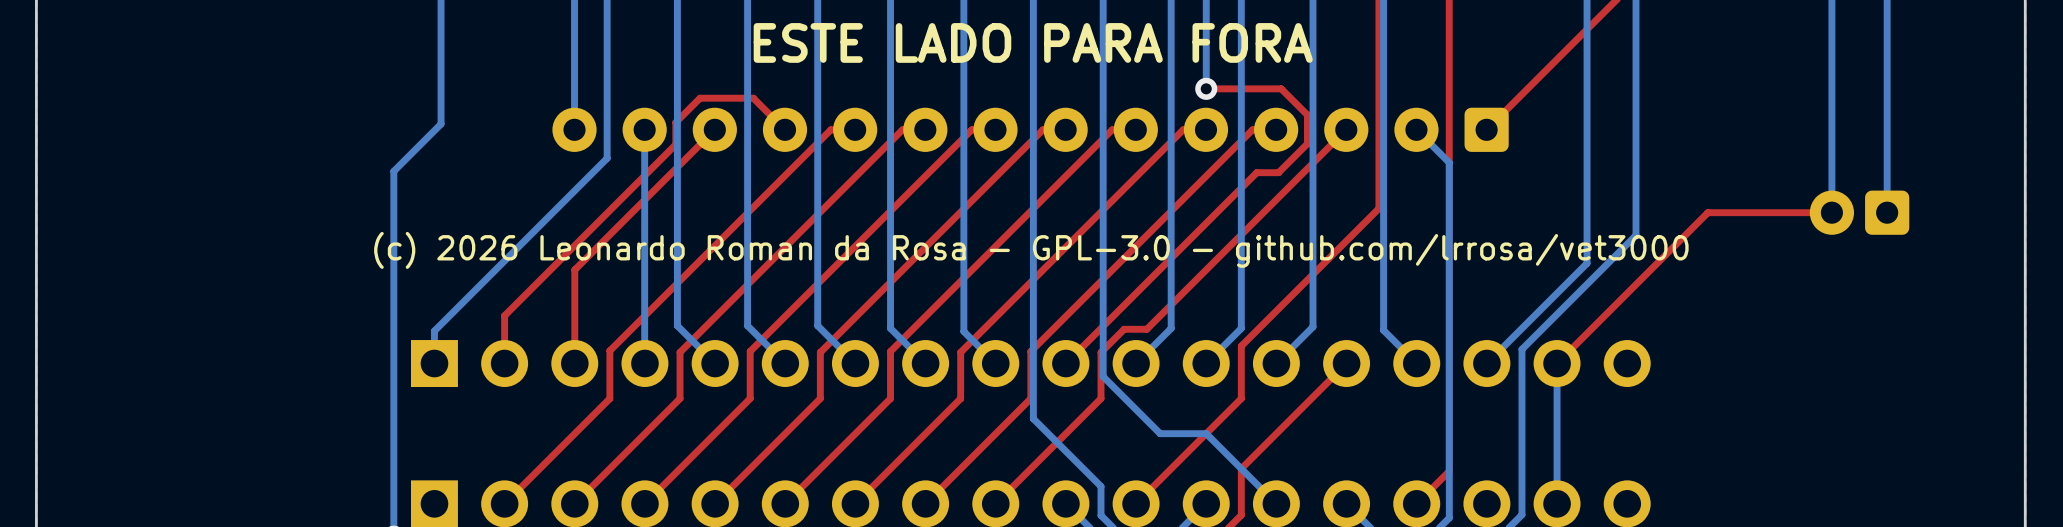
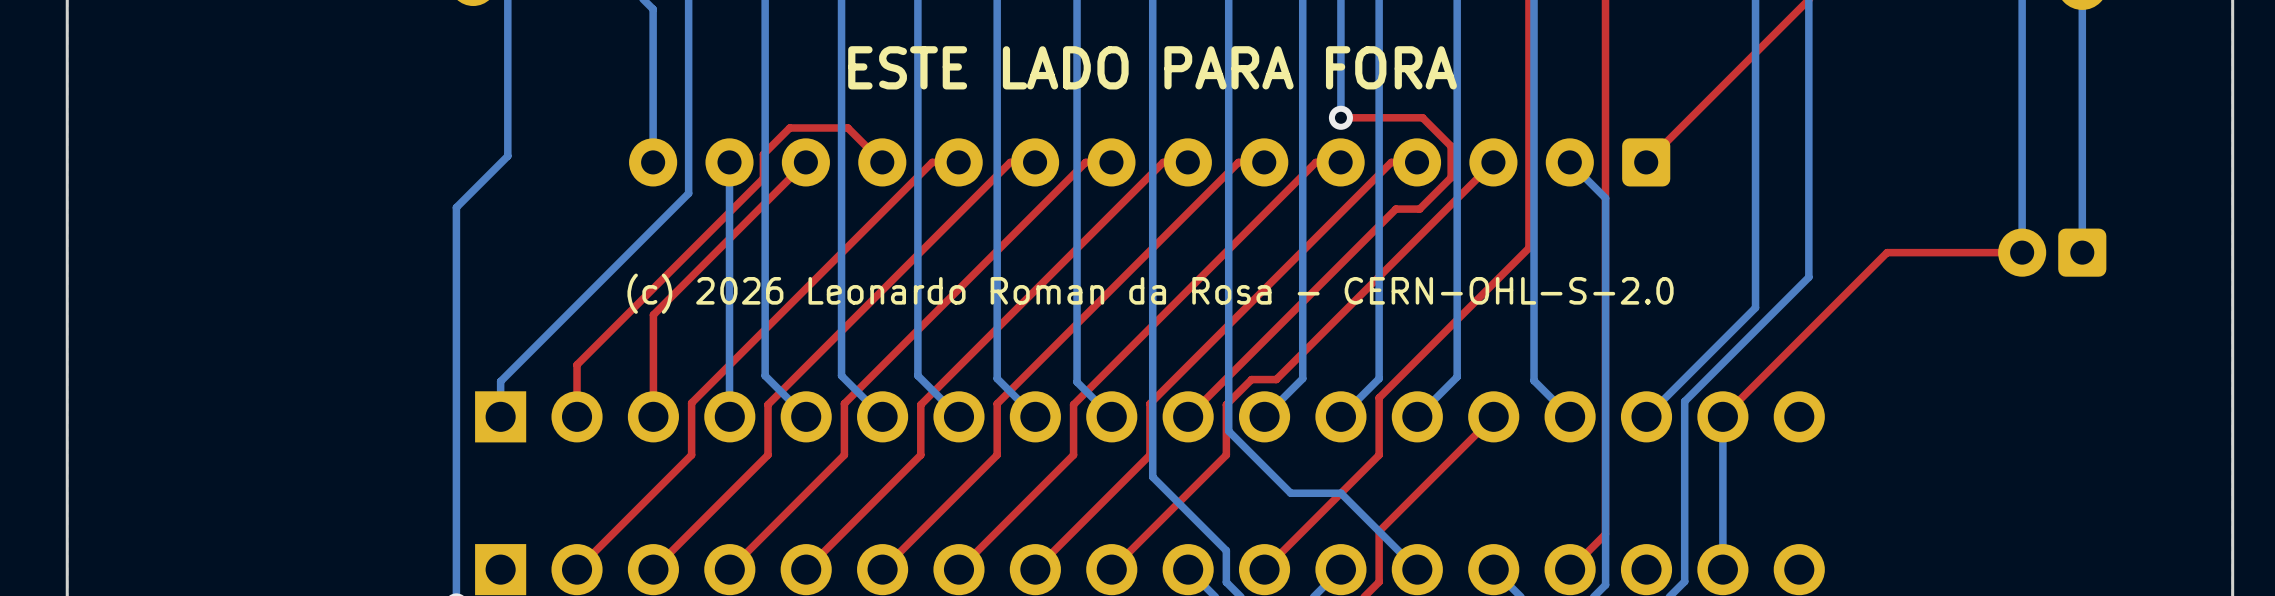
text: (c) 2026 Leonardo Roman da Rosa - GPL-3.0 - github.com/lrrosa/vet3000 (1031, 250) -> (c) 2026 Leonardo Roman da Rosa - CERN-OHL-S-2.0 (1150, 293)

